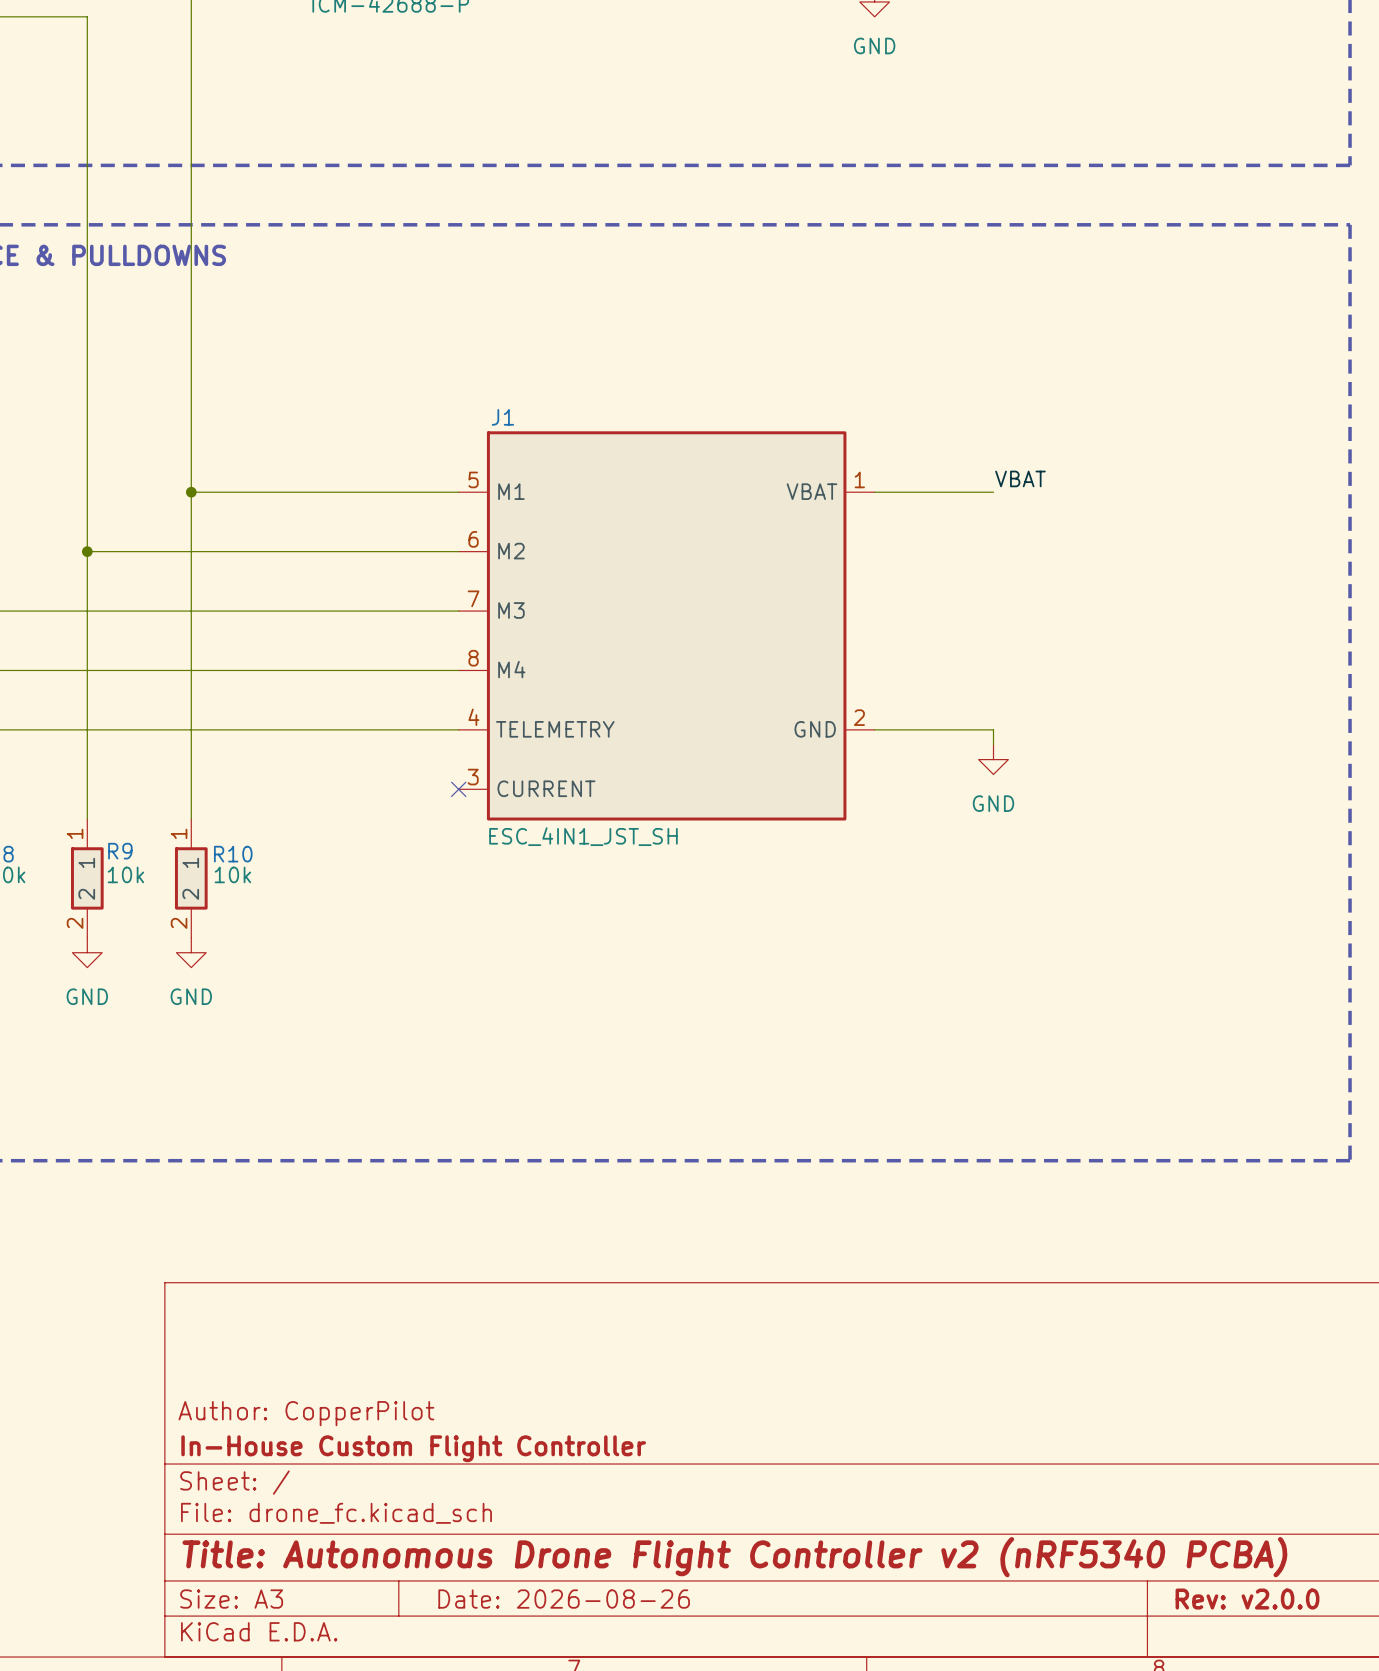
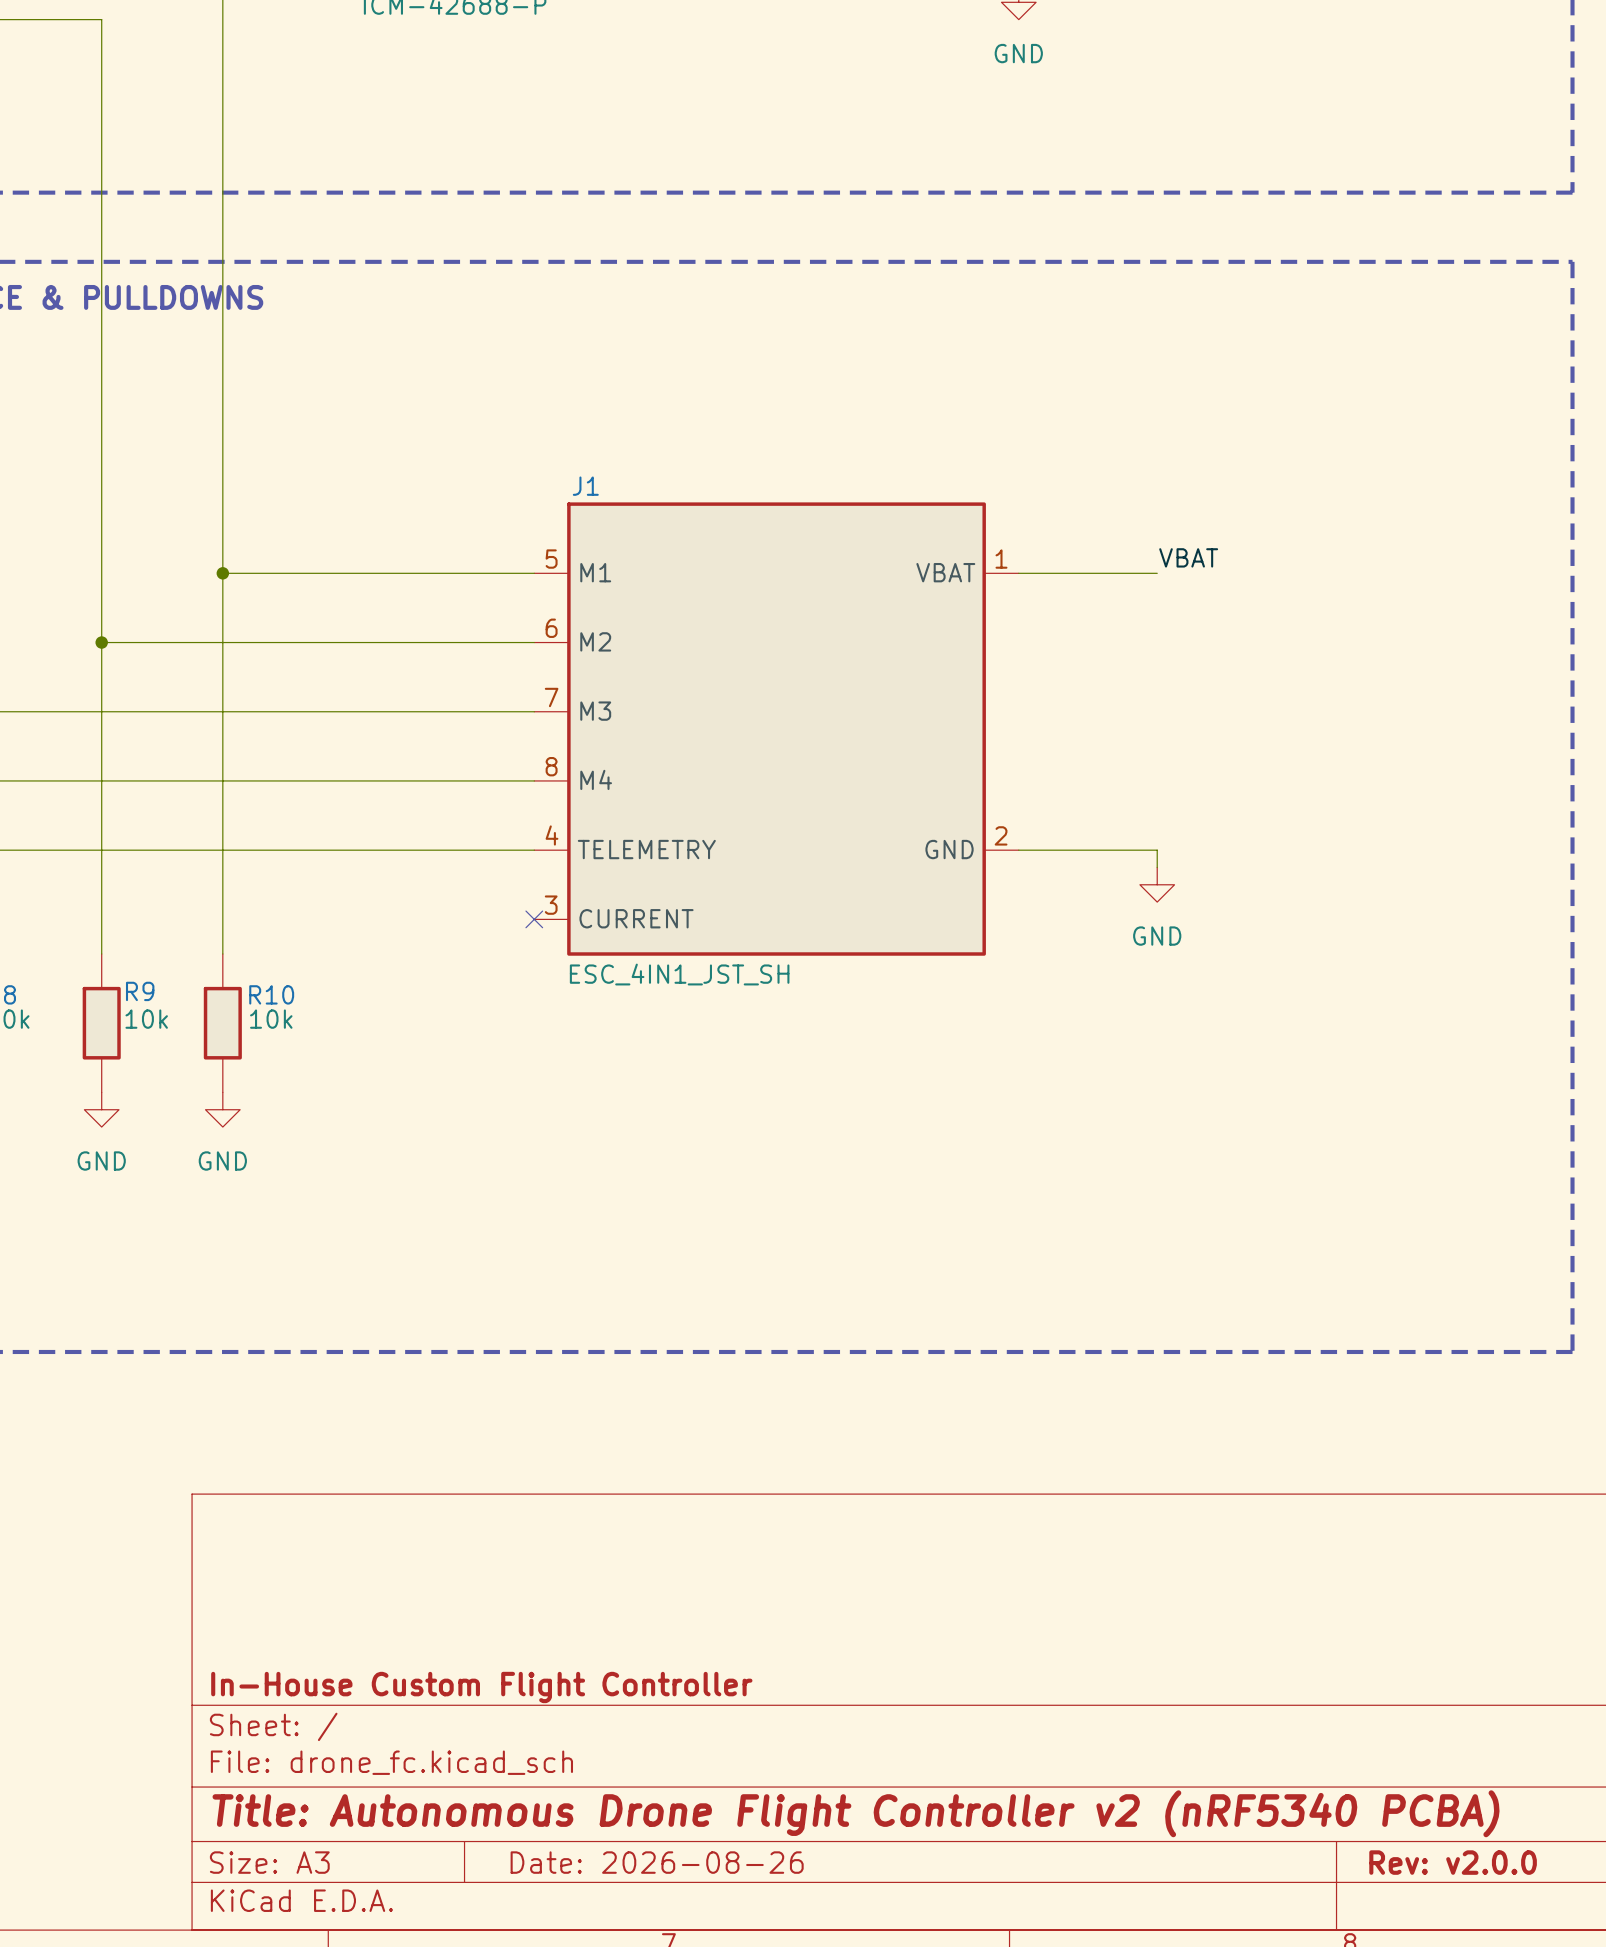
R9 pin number: 1 (75, 833) -> none
R10 pin number: 1 (179, 833) -> none
R9 pin name: 1 (86, 862) -> none
R10 pin name: 1 (190, 862) -> none
R9 pin name: 2 (86, 894) -> none
R10 pin name: 2 (190, 894) -> none
R9 pin number: 2 (75, 923) -> none
R10 pin number: 2 (179, 923) -> none
title block: Author: CopperPilot (306, 1413) -> none

